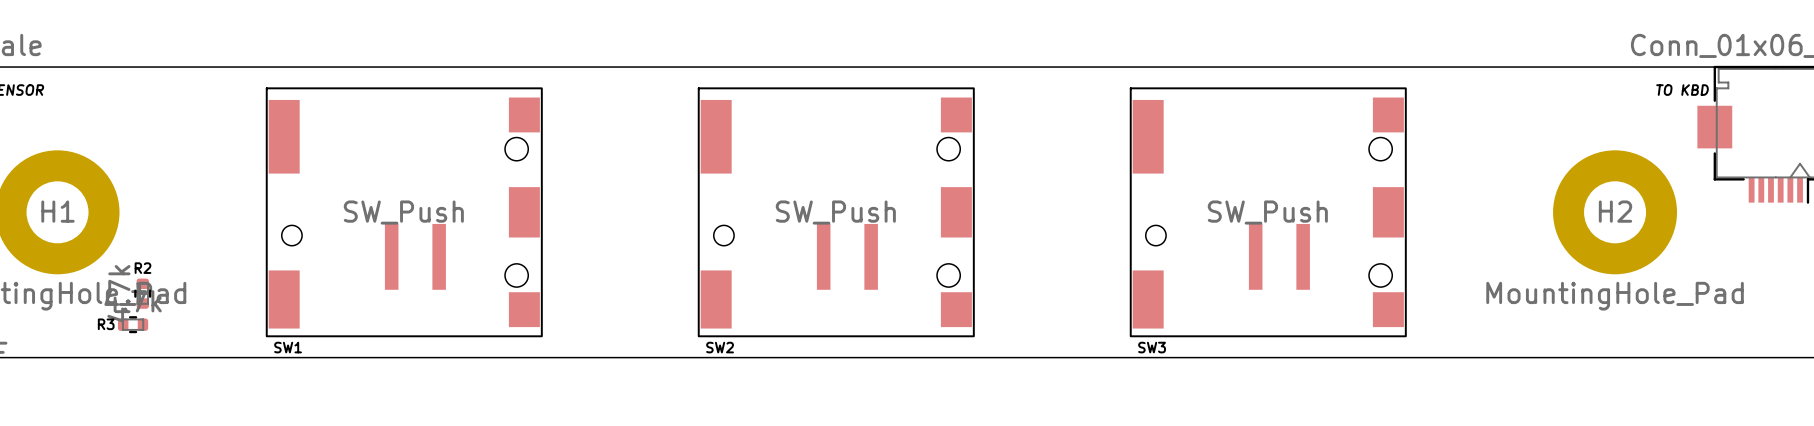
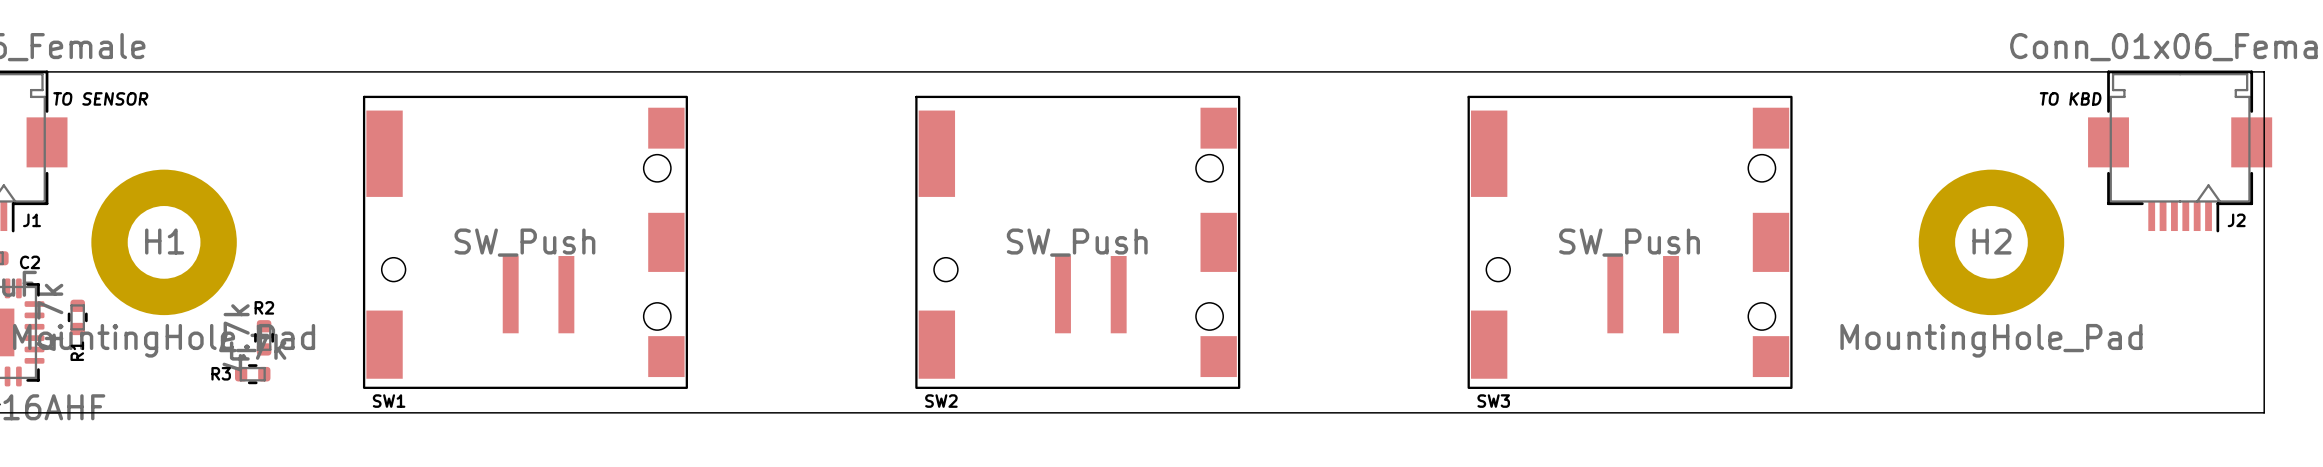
SW1 position: (404, 212) -> (525, 242)
SW3 position: (1268, 212) -> (1630, 242)

